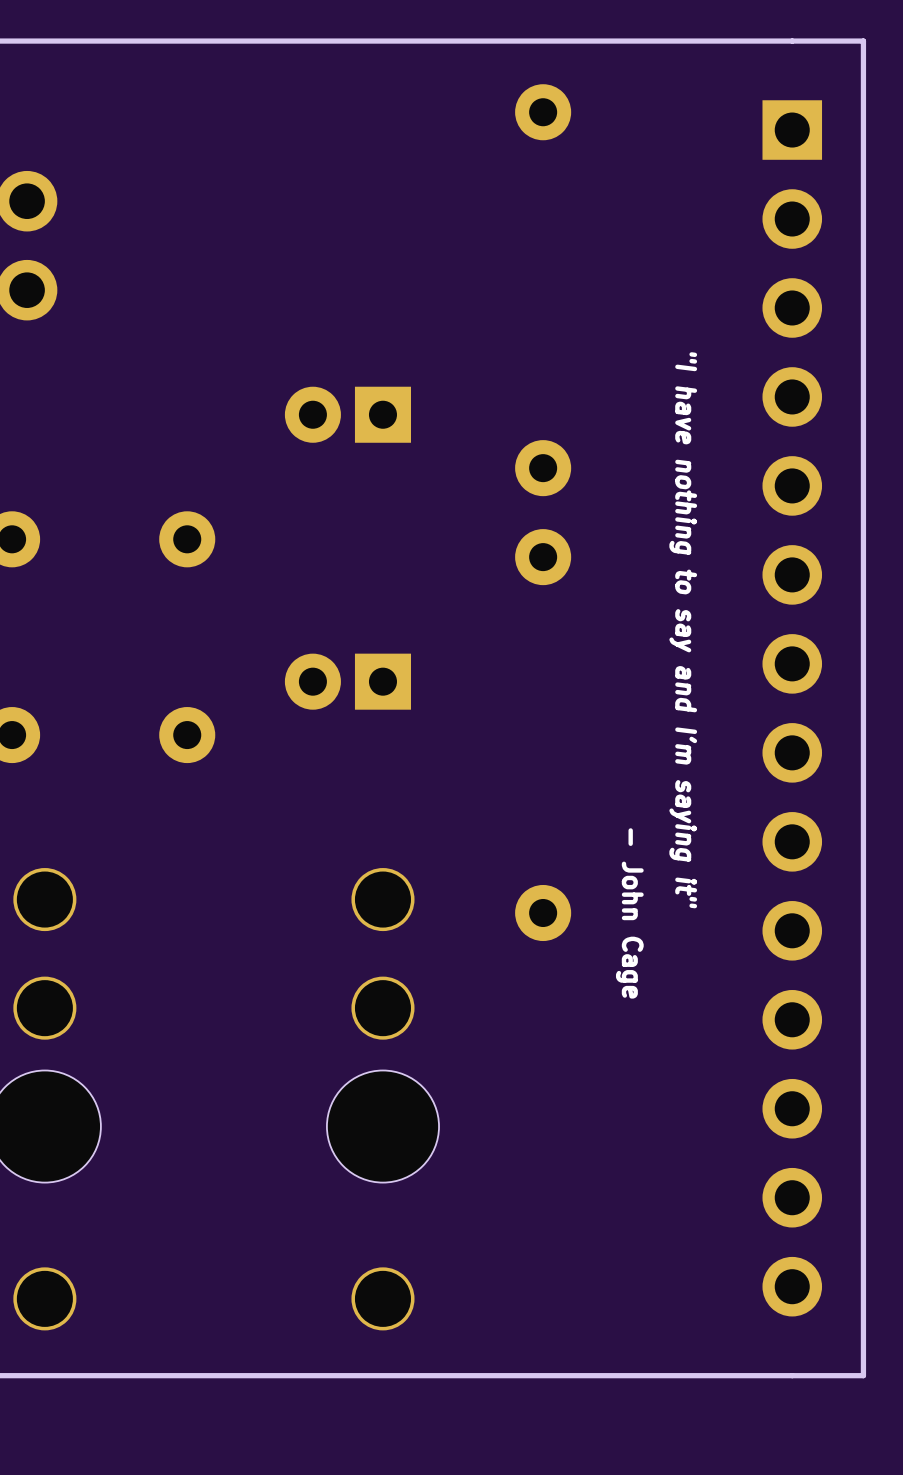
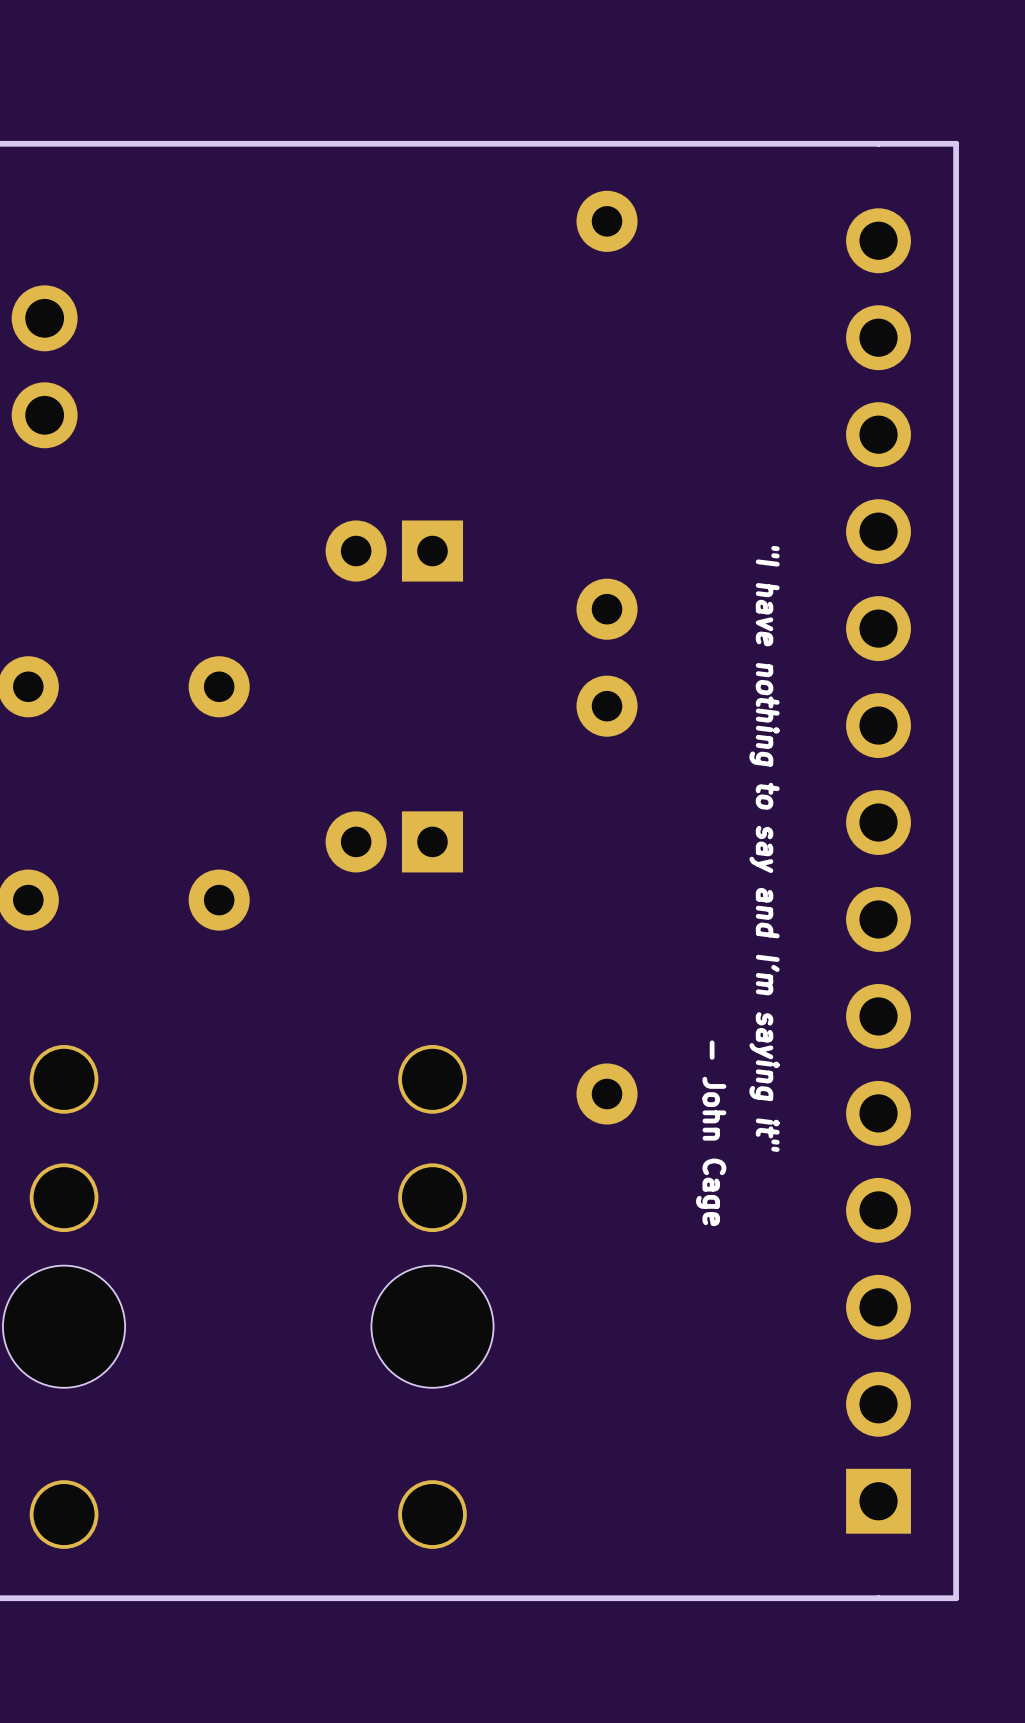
text position: "I have nothing to say and I'm saying it" (683, 630) -> "I have nothing to say and I'm saying it" (764, 848)
part rotation: 0° (792, 708) -> 180° (878, 871)
text position: - John Cage (629, 913) -> - John Cage (711, 1133)

